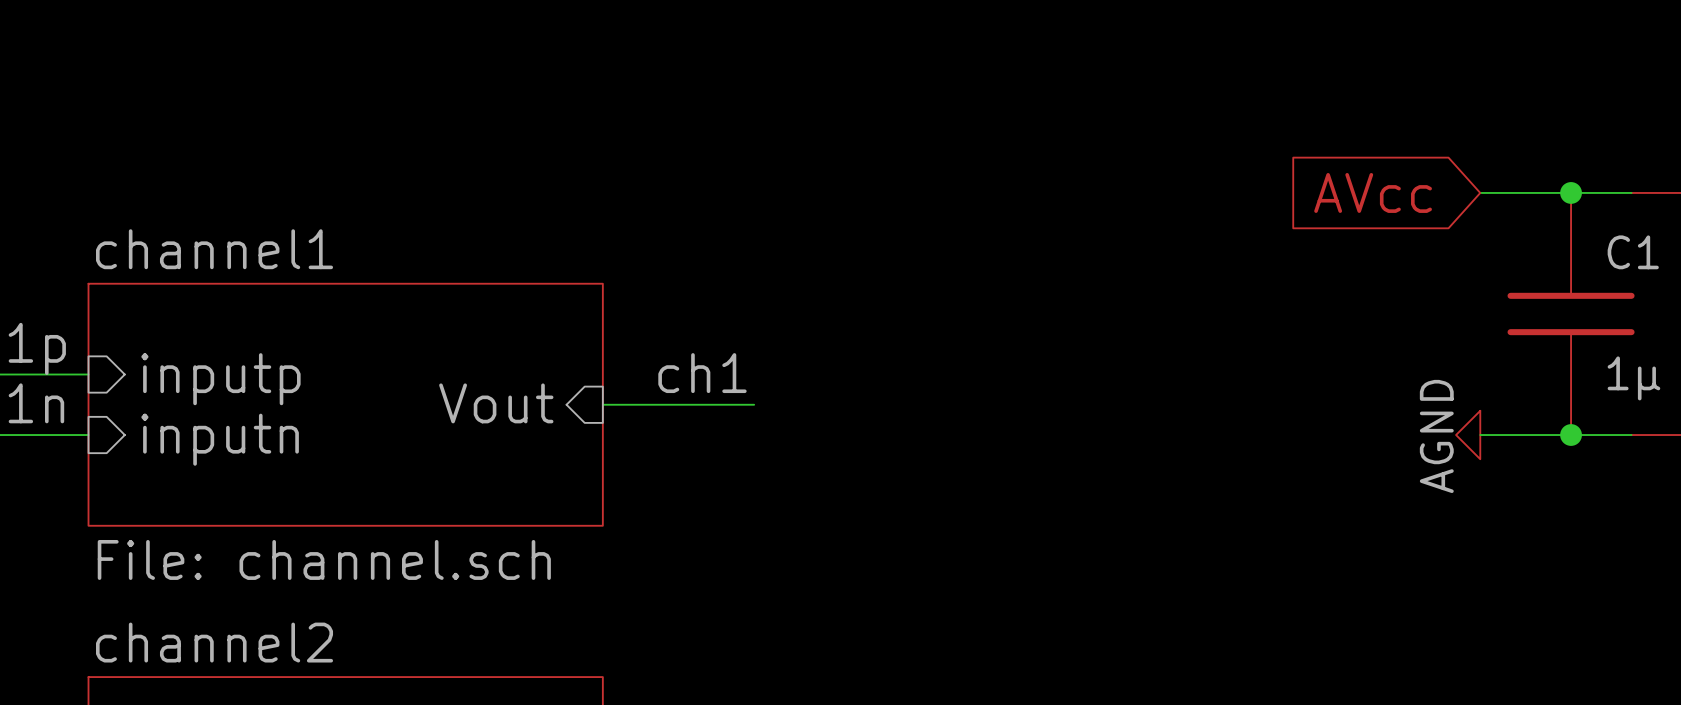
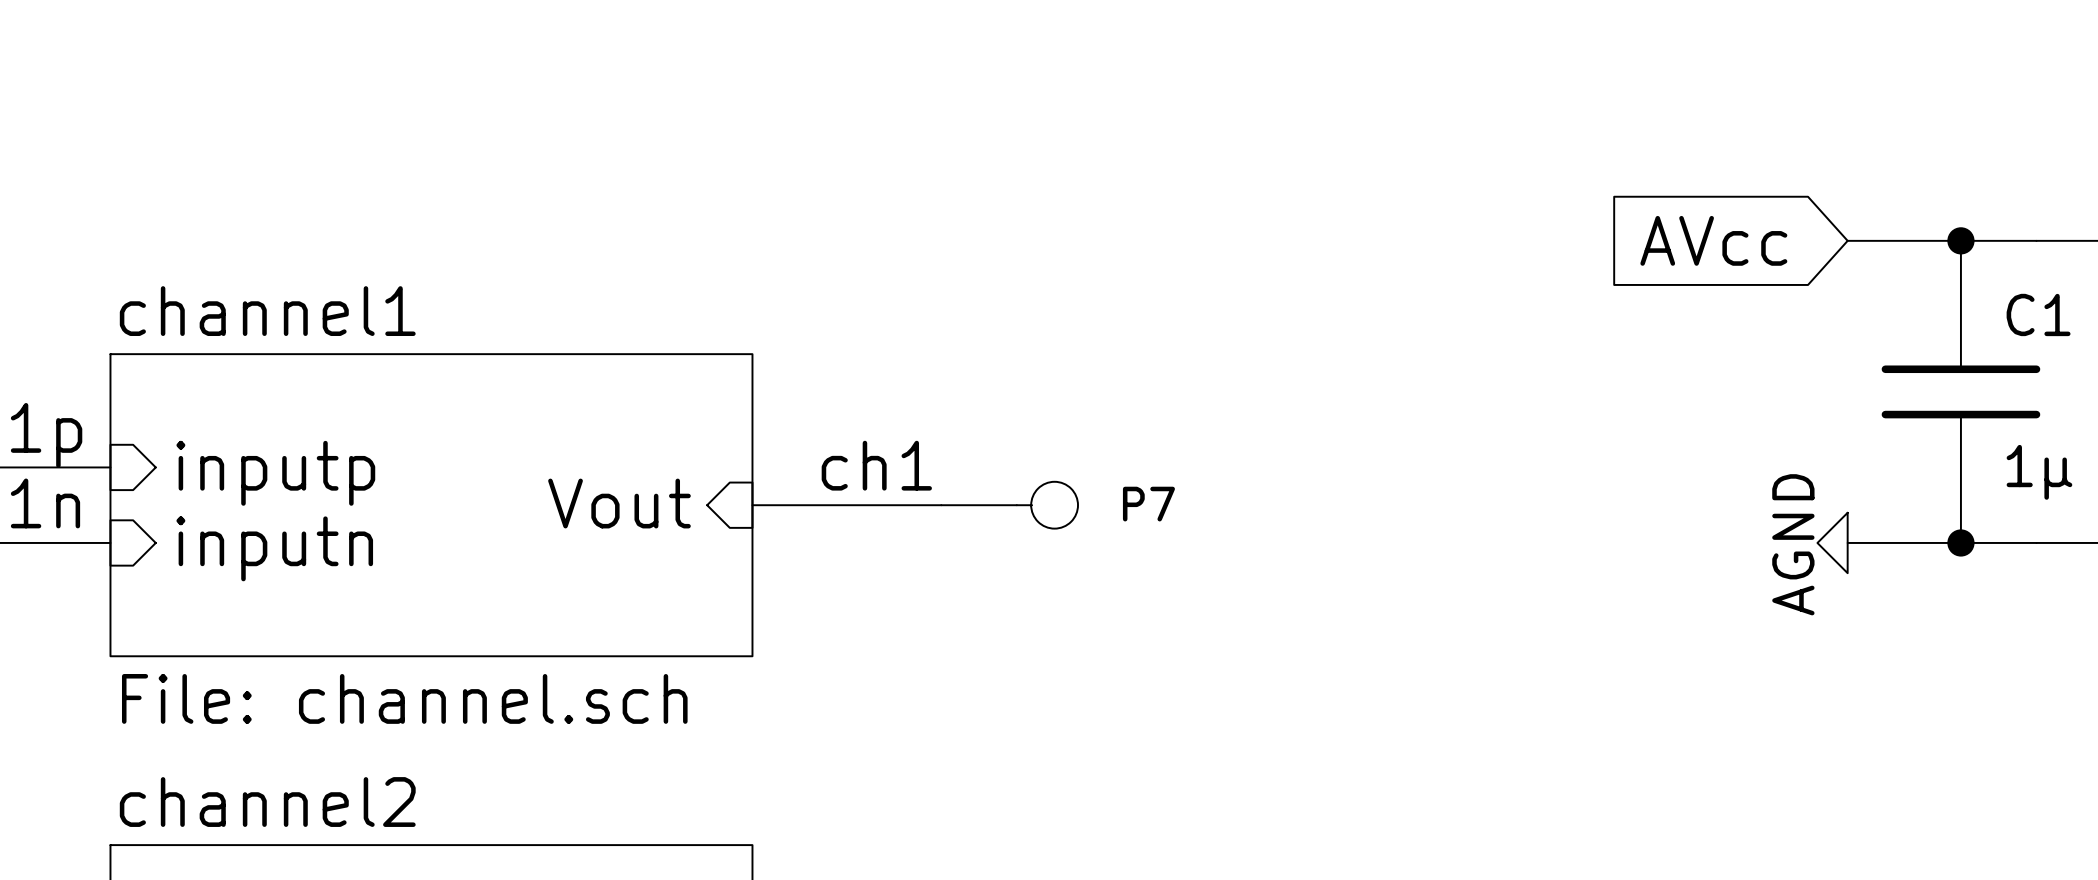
P7: none -> (1009, 505)

